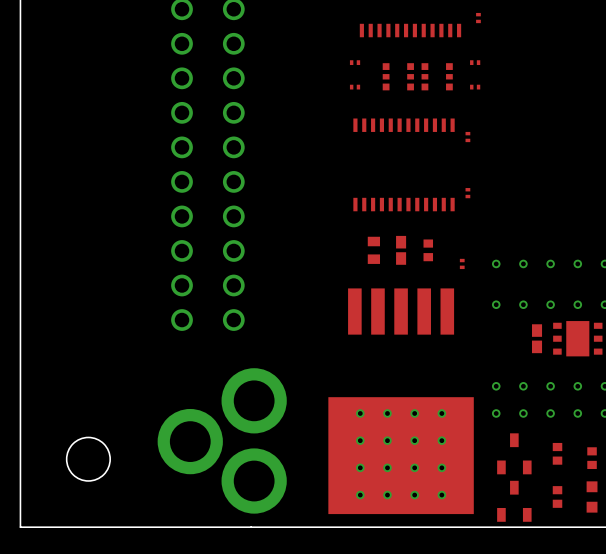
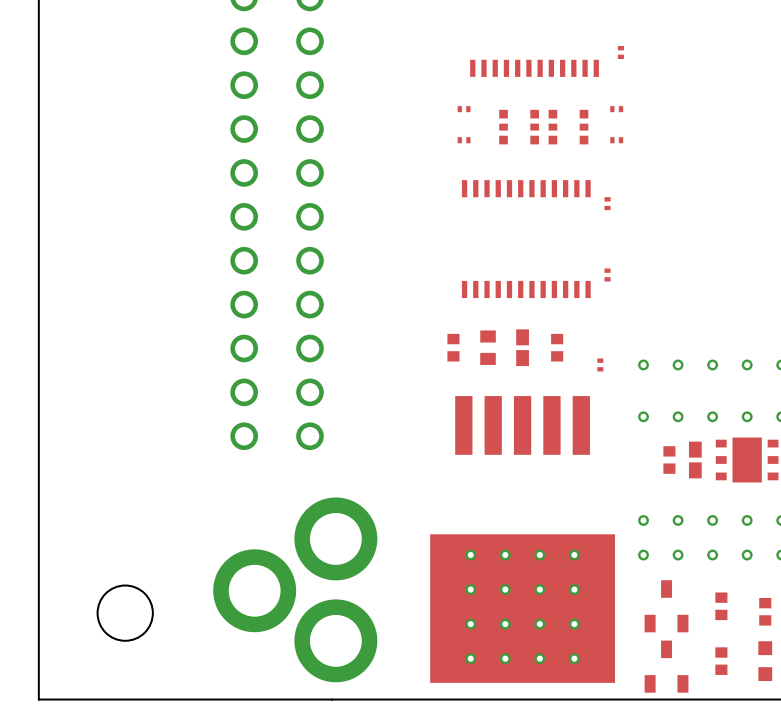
part: none -> (453, 347)
part: none -> (669, 460)

